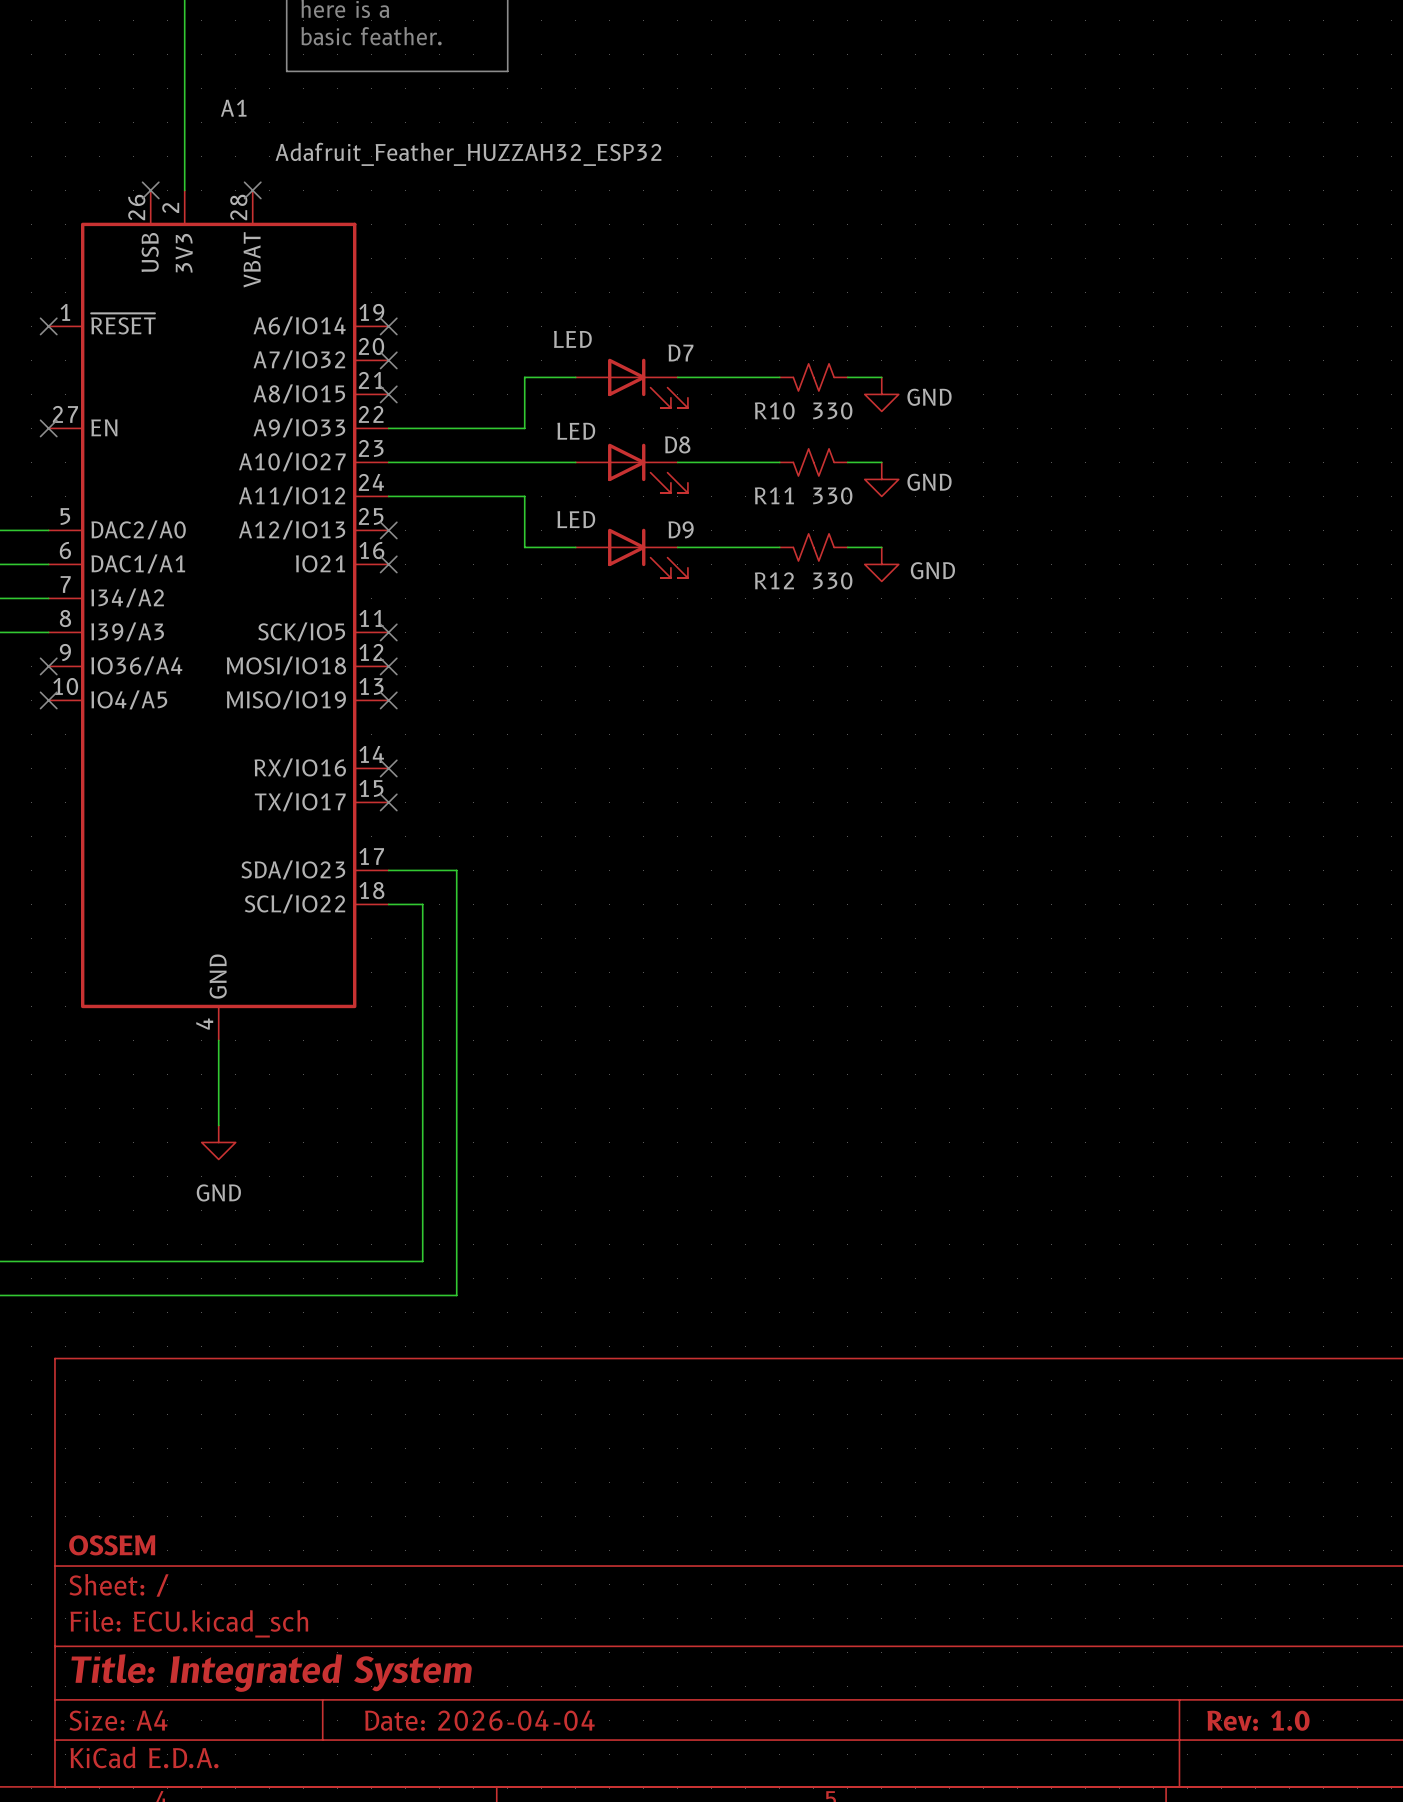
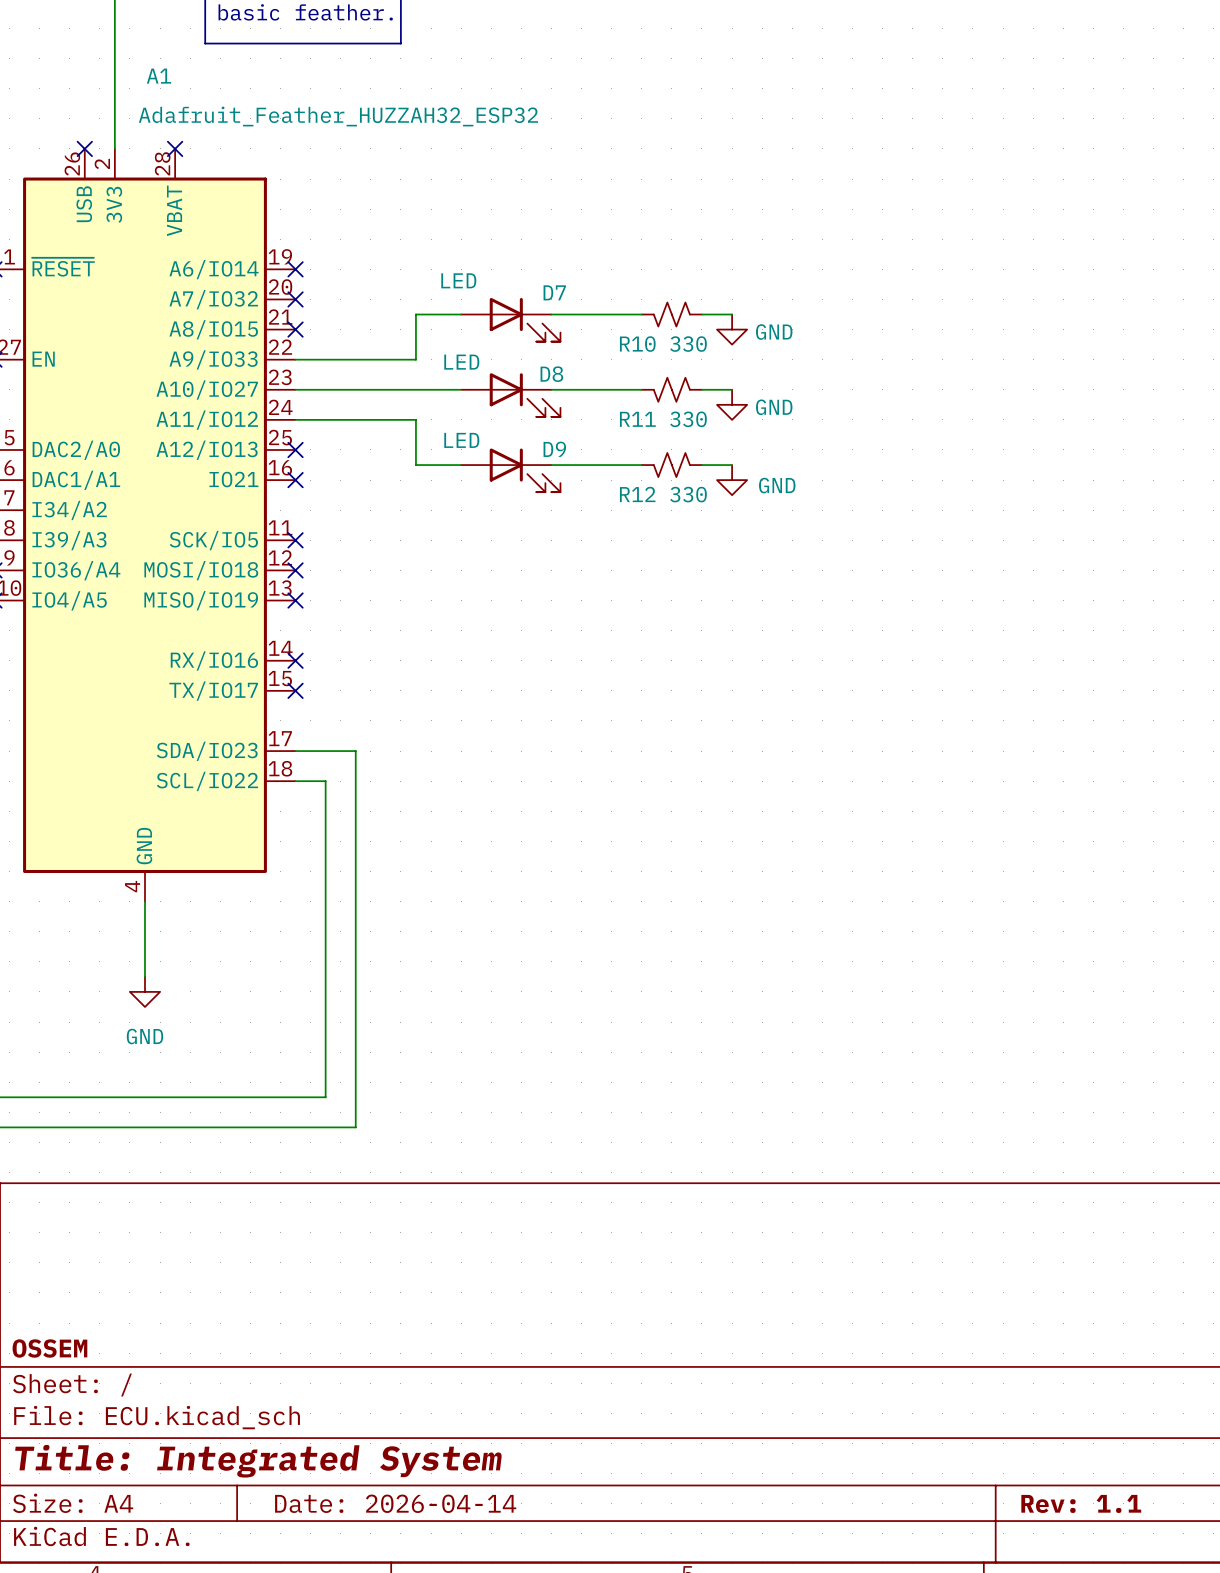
title block: Date: 2026-04-04 (479, 1720) -> Date: 2026-04-14 (395, 1503)
title block: Rev: 1.0 (1258, 1720) -> Rev: 1.1 (1081, 1503)

